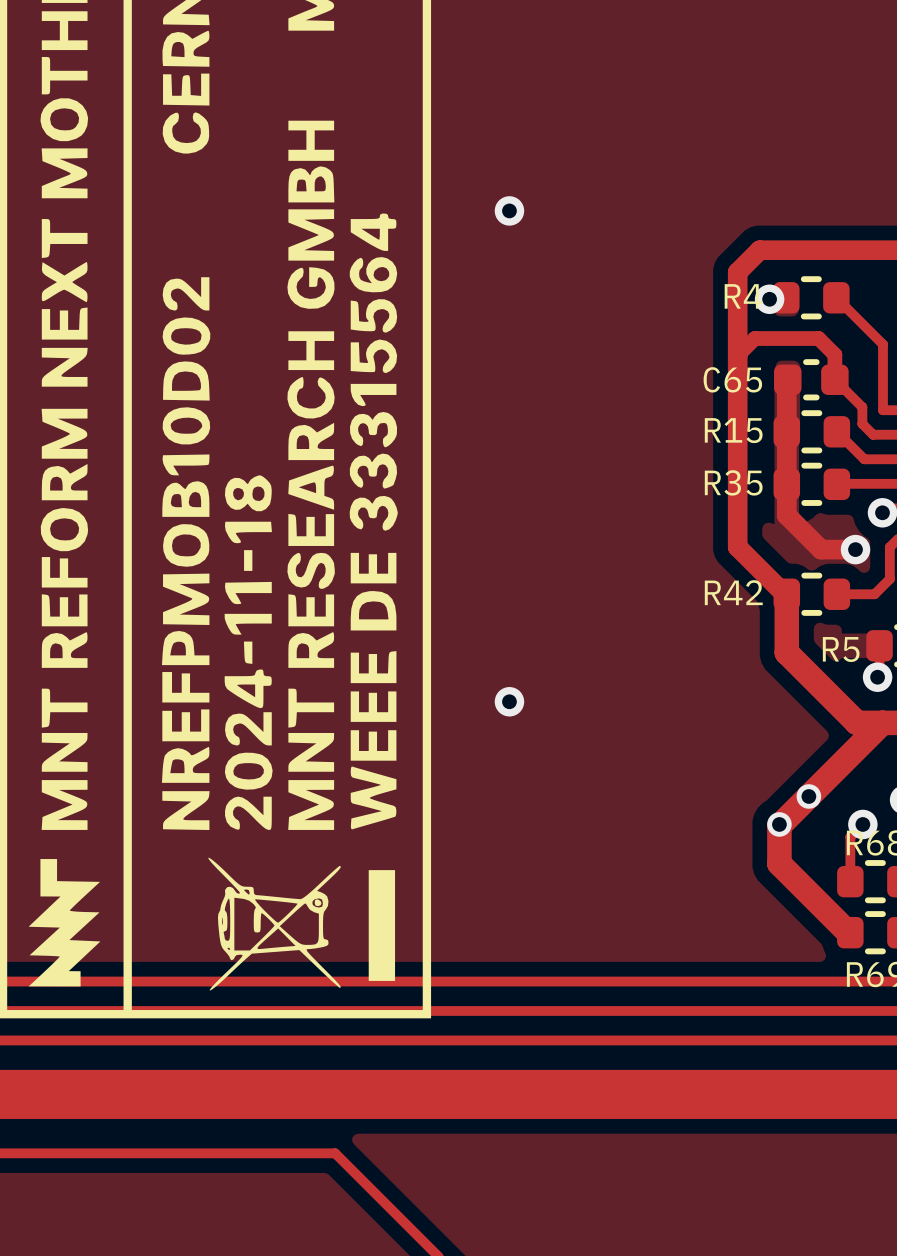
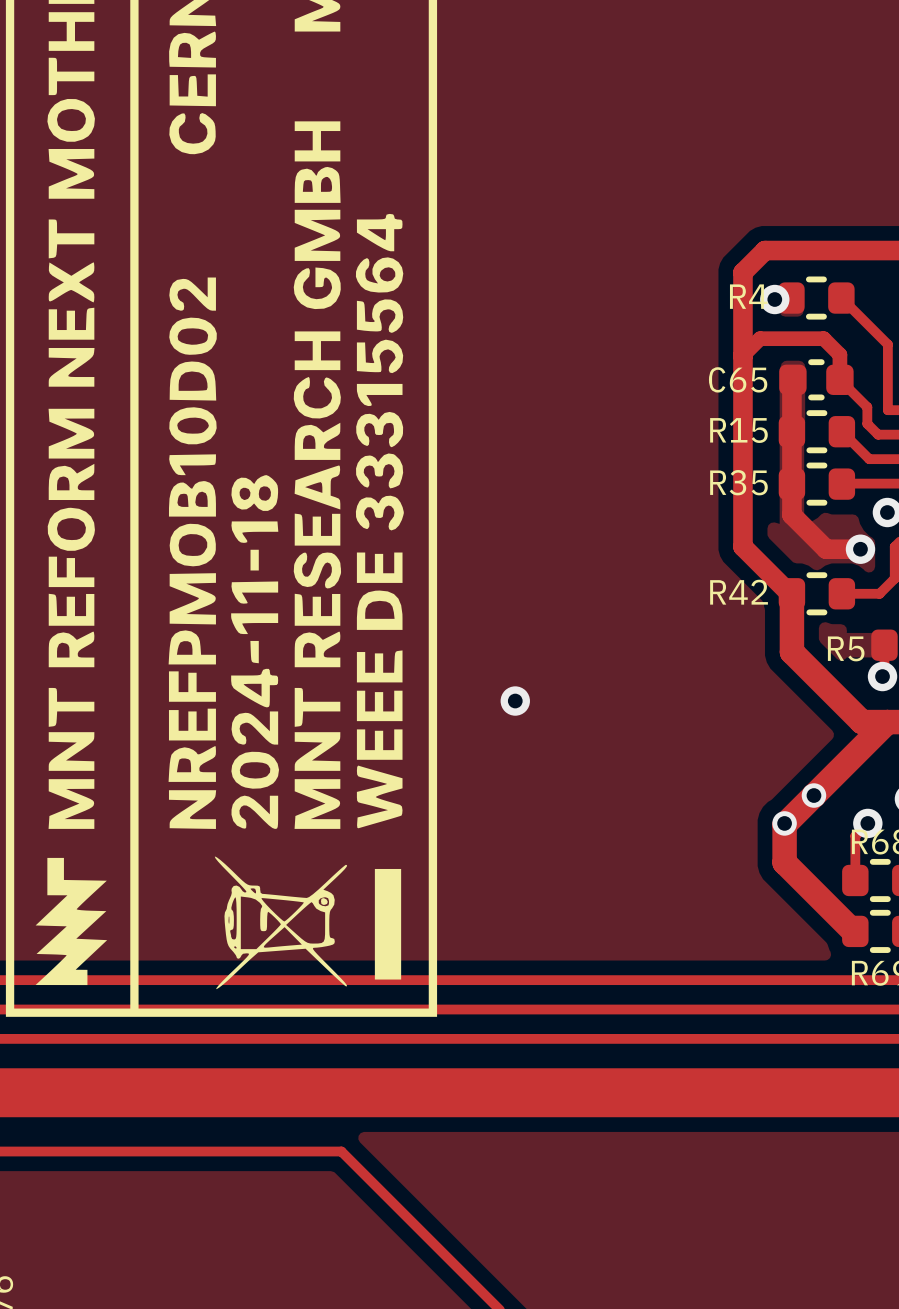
via: (509, 210) -> none

